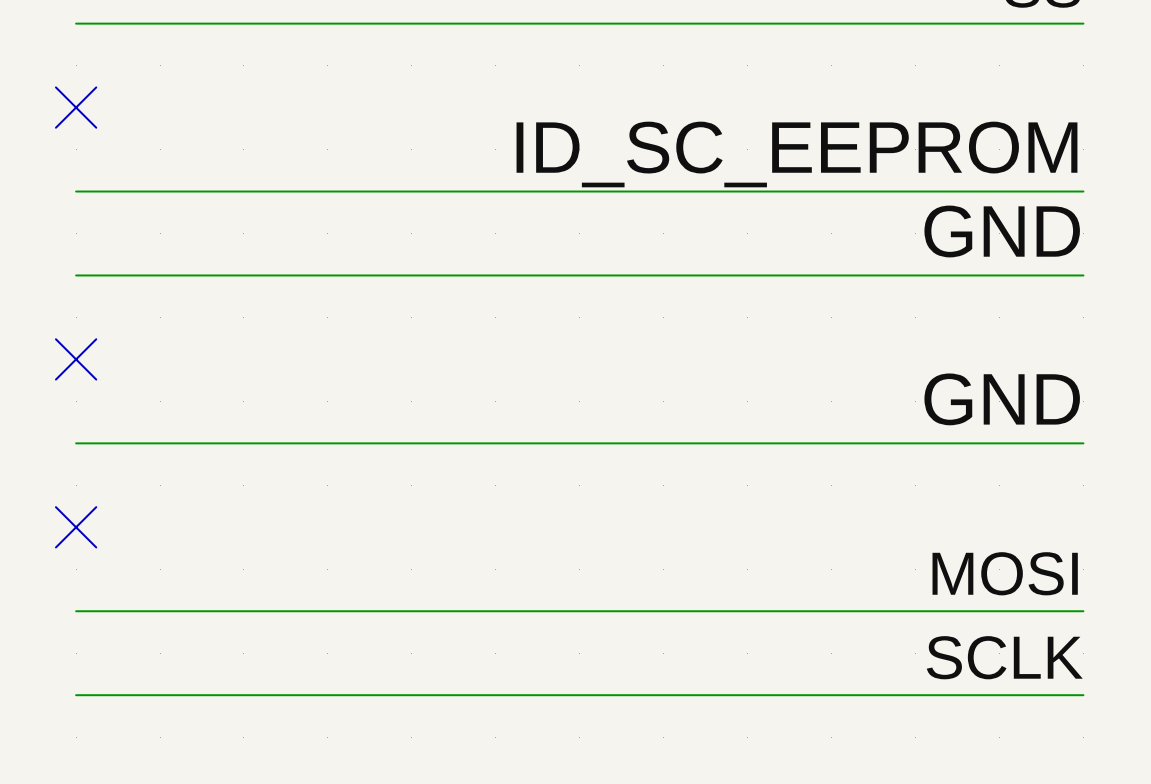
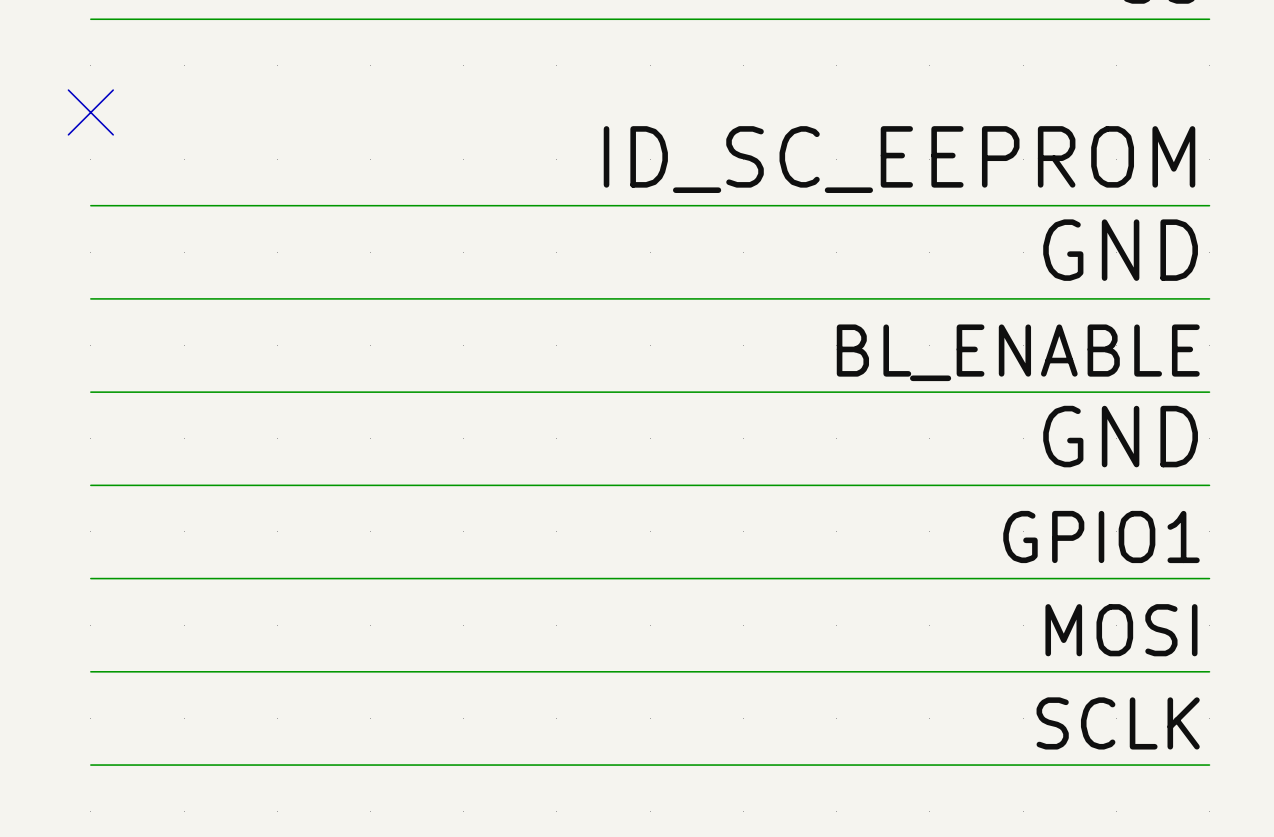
label: none -> BL_ENABLE (1018, 352)
wire: none -> (90, 392) (1209, 392)
no-connect mark: (76, 359) -> none
label: none -> GPIO1 (1101, 536)
wire: none -> (90, 578) (1209, 578)
no-connect mark: (76, 527) -> none

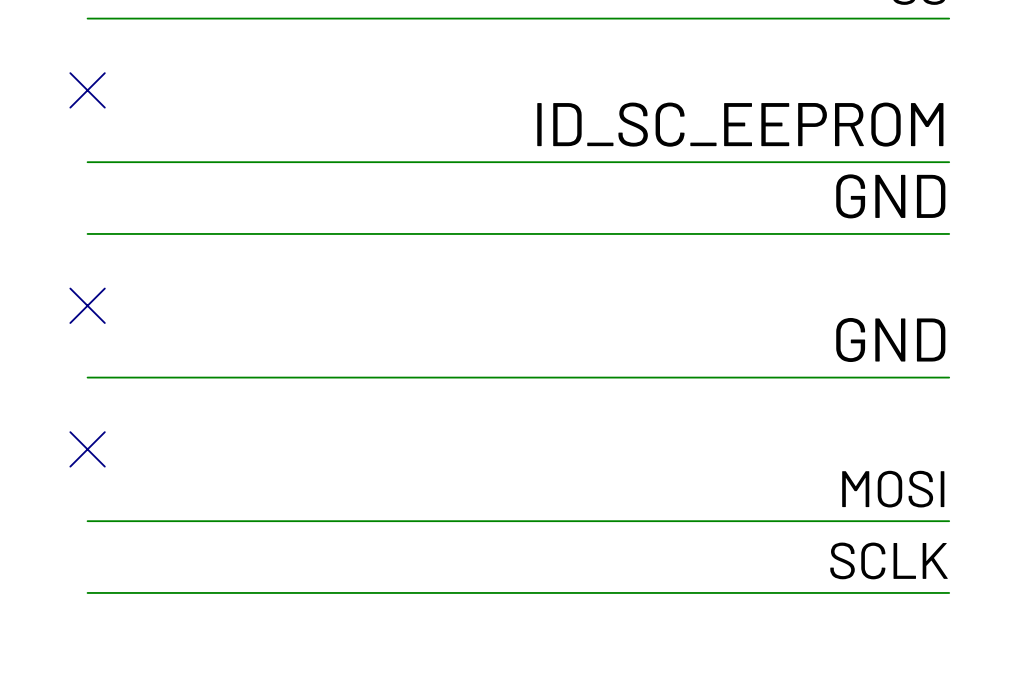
label: BL_ENABLE (1018, 352) -> none
wire: (90, 392) (1209, 392) -> none
no-connect mark: none -> (87, 305)
label: GPIO1 (1101, 536) -> none
wire: (90, 578) (1209, 578) -> none
no-connect mark: none -> (87, 449)

